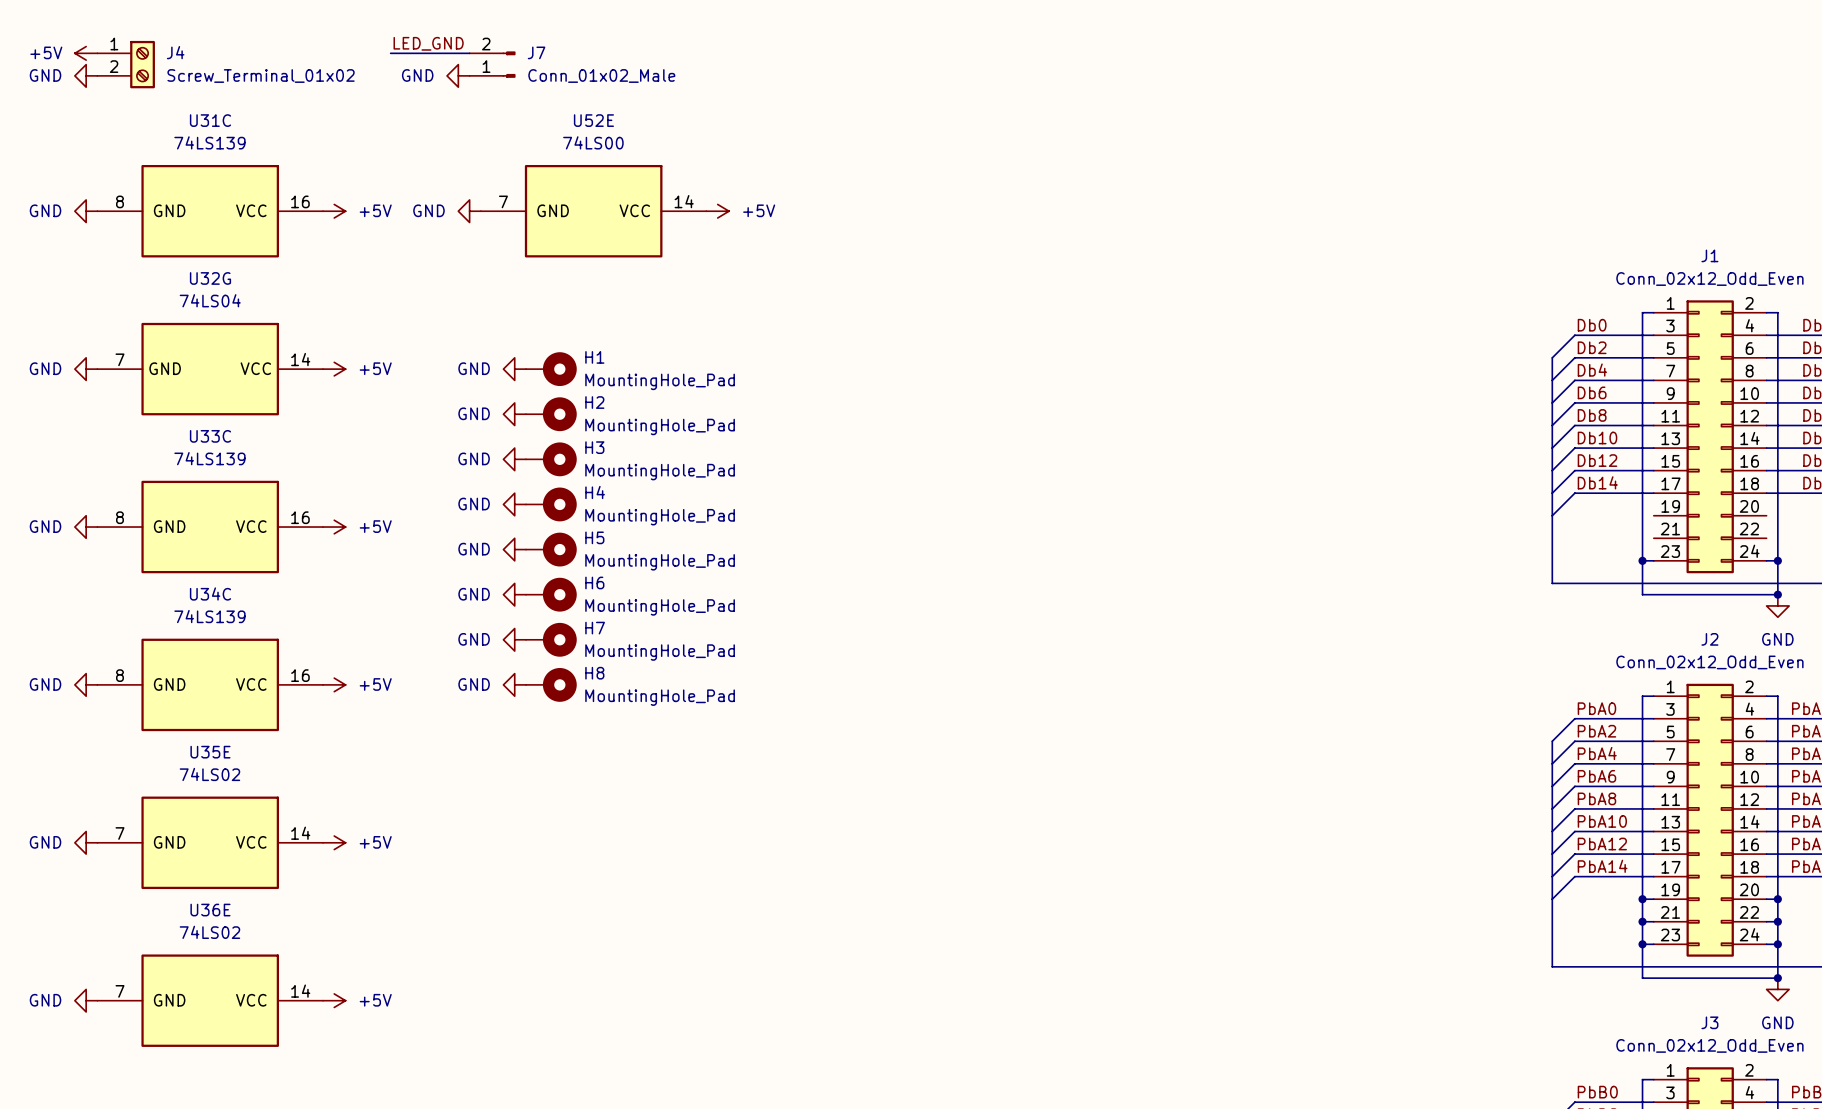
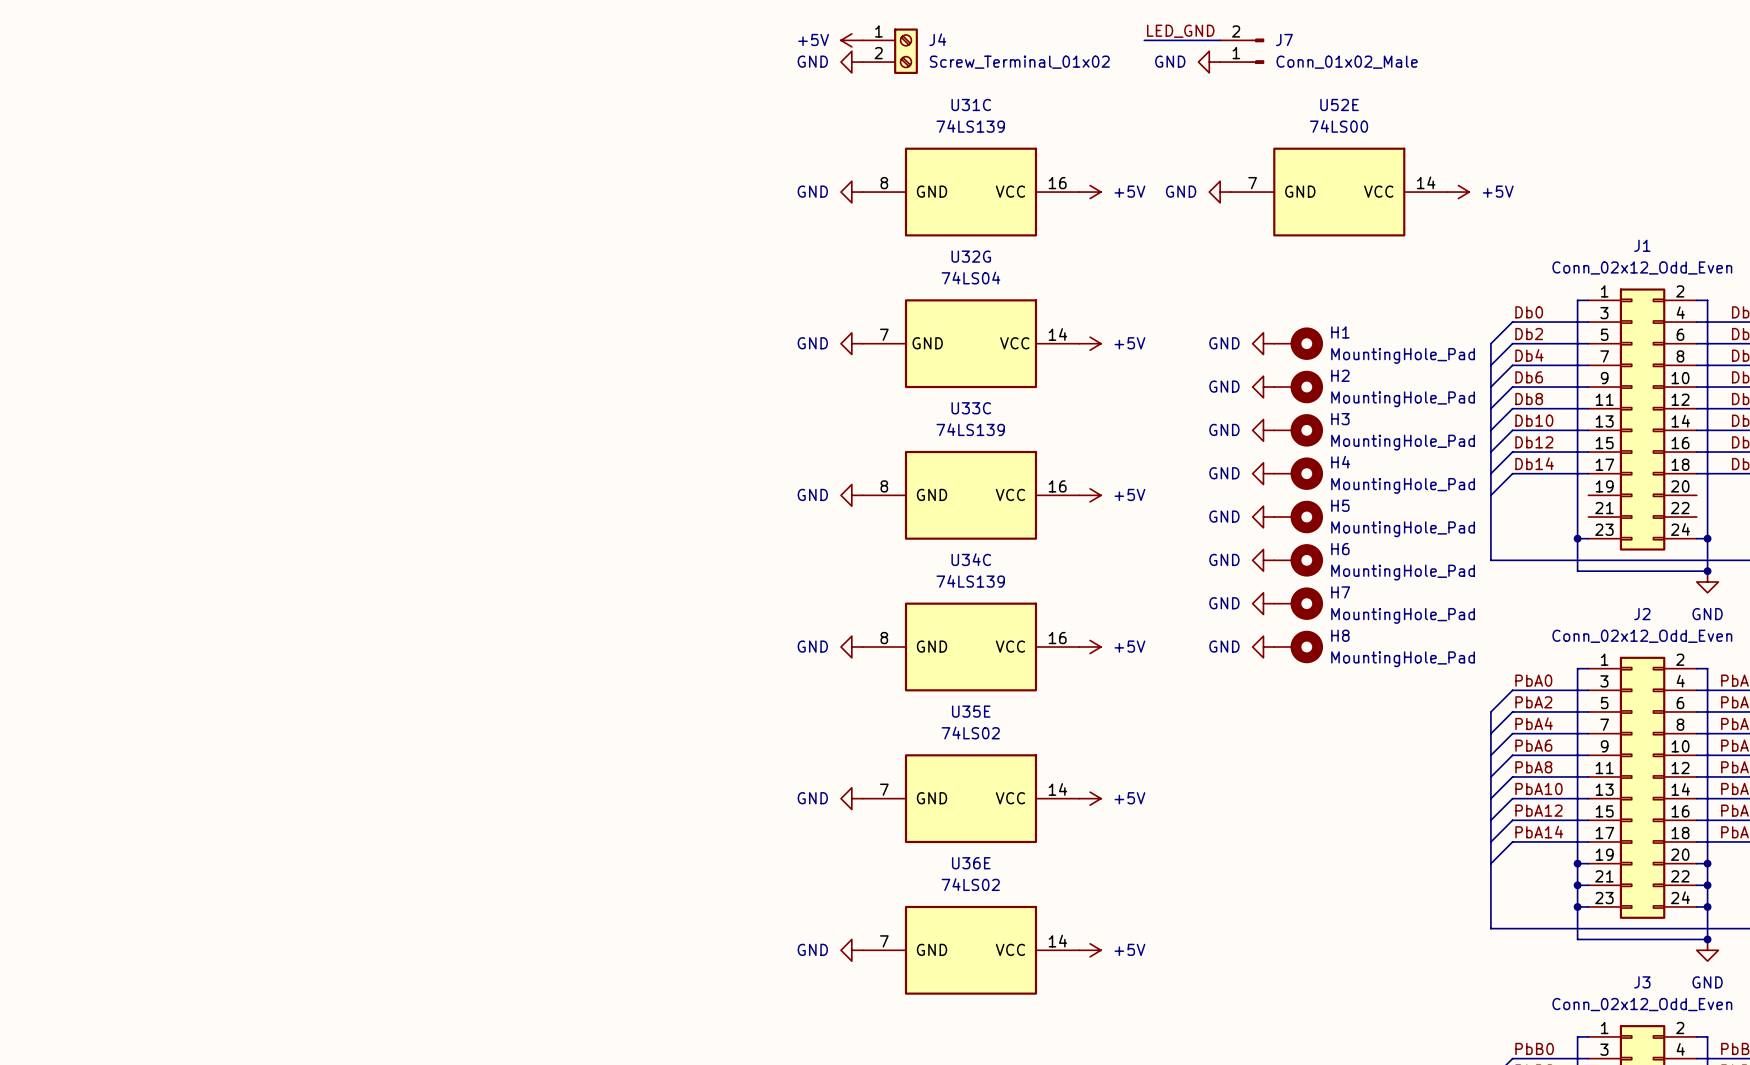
label: none -> LED_GND (1180, 31)
power symbol: none -> +5V (851, 40)
wire: none -> (1144, 40) (1220, 40)
label: LED_GND (428, 43) -> none
power symbol: +5V (86, 53) -> none
wire: (390, 53) (469, 53) -> none
J4 position: (126, 64) -> (890, 51)
J7 position: (492, 64) -> (1242, 51)
power symbol: none -> GND (851, 62)
power symbol: none -> GND (1209, 62)
power symbol: GND (86, 75) -> none
power symbol: GND (458, 75) -> none
power symbol: none -> GND (851, 192)
power symbol: none -> +5V (1090, 192)
power symbol: none -> GND (1220, 192)
power symbol: none -> +5V (1458, 192)
power symbol: GND (86, 211) -> none
U31C position: (210, 211) -> (970, 192)
power symbol: +5V (334, 211) -> none
power symbol: GND (469, 211) -> none
U52E position: (593, 211) -> (1339, 192)
power symbol: +5V (717, 211) -> none
power symbol: none -> GND (851, 343)
power symbol: none -> +5V (1090, 343)
power symbol: none -> GND (1263, 343)
power symbol: GND (86, 369) -> none
U32G position: (210, 369) -> (970, 343)
power symbol: +5V (334, 369) -> none
power symbol: GND (514, 369) -> none
H1 position: (551, 369) -> (1298, 343)
power symbol: none -> GND (1263, 387)
power symbol: GND (514, 414) -> none
H2 position: (551, 414) -> (1298, 387)
power symbol: none -> GND (1263, 430)
power symbol: GND (514, 459) -> none
H3 position: (551, 459) -> (1298, 430)
power symbol: none -> GND (1263, 473)
power symbol: GND (514, 504) -> none
H4 position: (551, 504) -> (1298, 473)
power symbol: none -> GND (851, 495)
power symbol: none -> +5V (1090, 495)
power symbol: GND (86, 527) -> none
U33C position: (210, 527) -> (970, 495)
power symbol: +5V (334, 527) -> none
power symbol: none -> GND (1263, 517)
power symbol: GND (514, 549) -> none
H5 position: (551, 549) -> (1298, 517)
power symbol: none -> GND (1263, 560)
power symbol: GND (514, 594) -> none
H6 position: (551, 594) -> (1298, 560)
power symbol: none -> GND (1263, 603)
power symbol: GND (514, 639) -> none
H7 position: (551, 639) -> (1298, 603)
power symbol: none -> GND (851, 646)
power symbol: none -> +5V (1090, 646)
power symbol: none -> GND (1263, 646)
power symbol: GND (86, 684) -> none
U34C position: (210, 684) -> (970, 646)
power symbol: +5V (334, 684) -> none
power symbol: GND (514, 684) -> none
H8 position: (551, 684) -> (1298, 646)
power symbol: none -> GND (851, 798)
power symbol: none -> +5V (1090, 798)
power symbol: GND (86, 842) -> none
U35E position: (210, 842) -> (970, 798)
power symbol: +5V (334, 842) -> none
power symbol: none -> GND (851, 950)
power symbol: none -> +5V (1090, 950)
power symbol: GND (86, 1000) -> none
U36E position: (210, 1000) -> (970, 950)
power symbol: +5V (334, 1000) -> none

